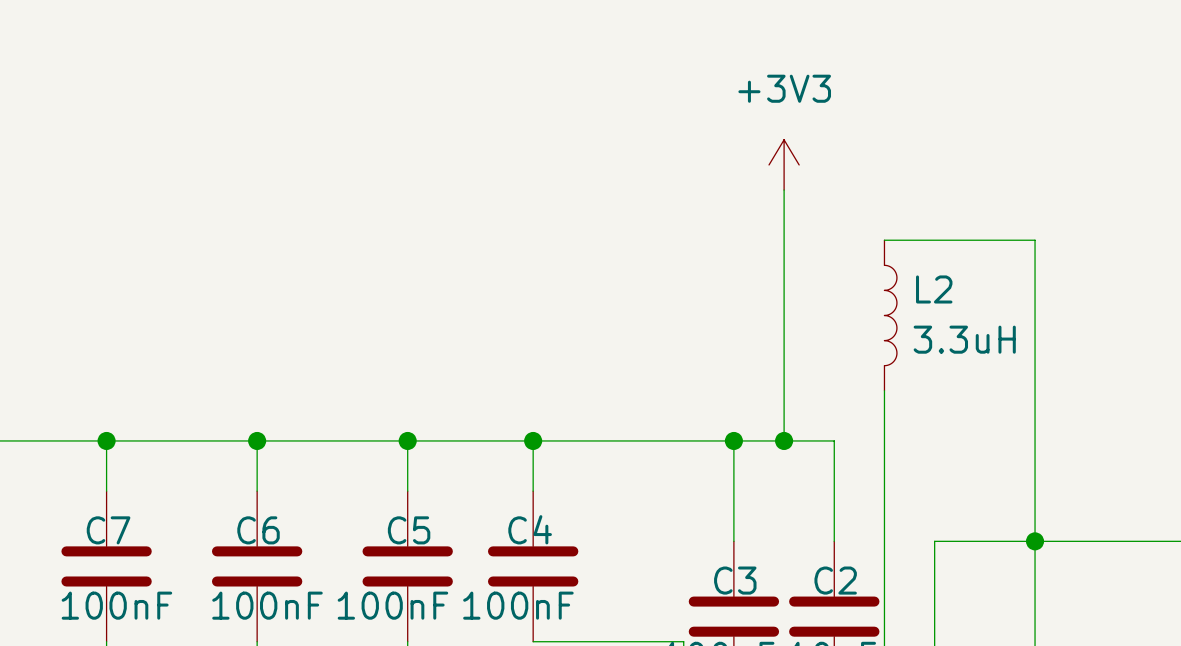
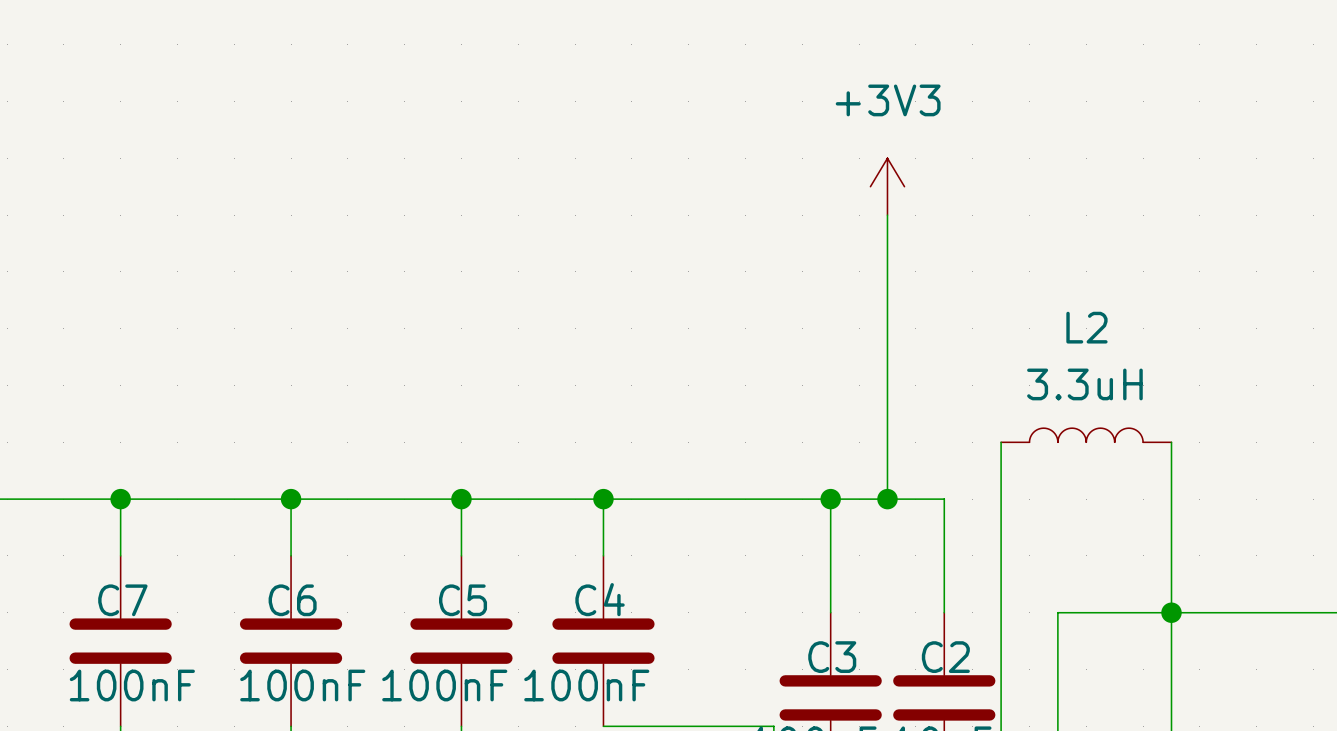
wire: (884, 240) (1035, 240) (1035, 390) -> none
L2 name position: L2 (934, 289) -> L2 (1086, 327)
L2 rotation: 0° (890, 315) -> 90° counterclockwise (1086, 435)
L2 position: (890, 315) -> (1086, 435)
L2 value position: 3.3uH (964, 339) -> 3.3uH (1084, 384)

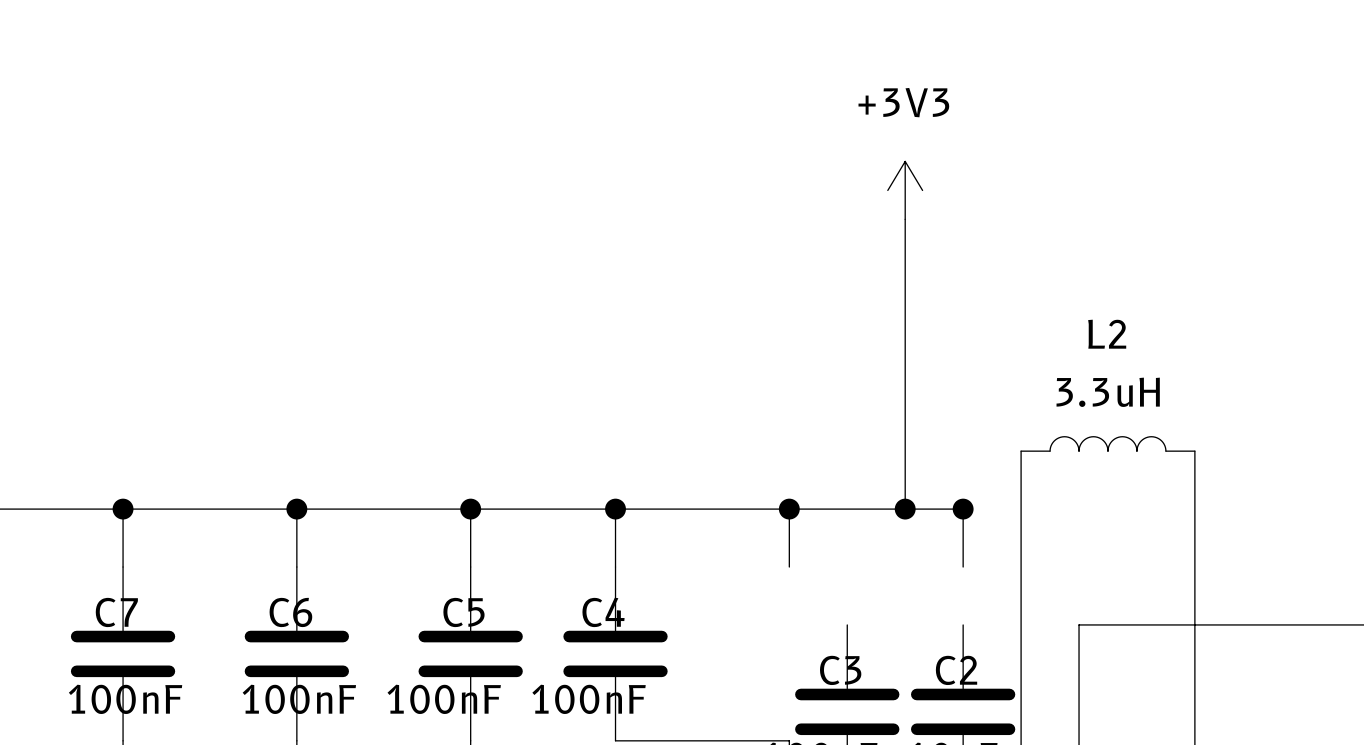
junction: none -> (789, 509)
wire: (830, 499) (830, 612) -> none
junction: (830, 499) -> none
junction: none -> (963, 509)
wire: (944, 555) (944, 612) -> (789, 509) (789, 567)
junction: (1171, 612) -> none

